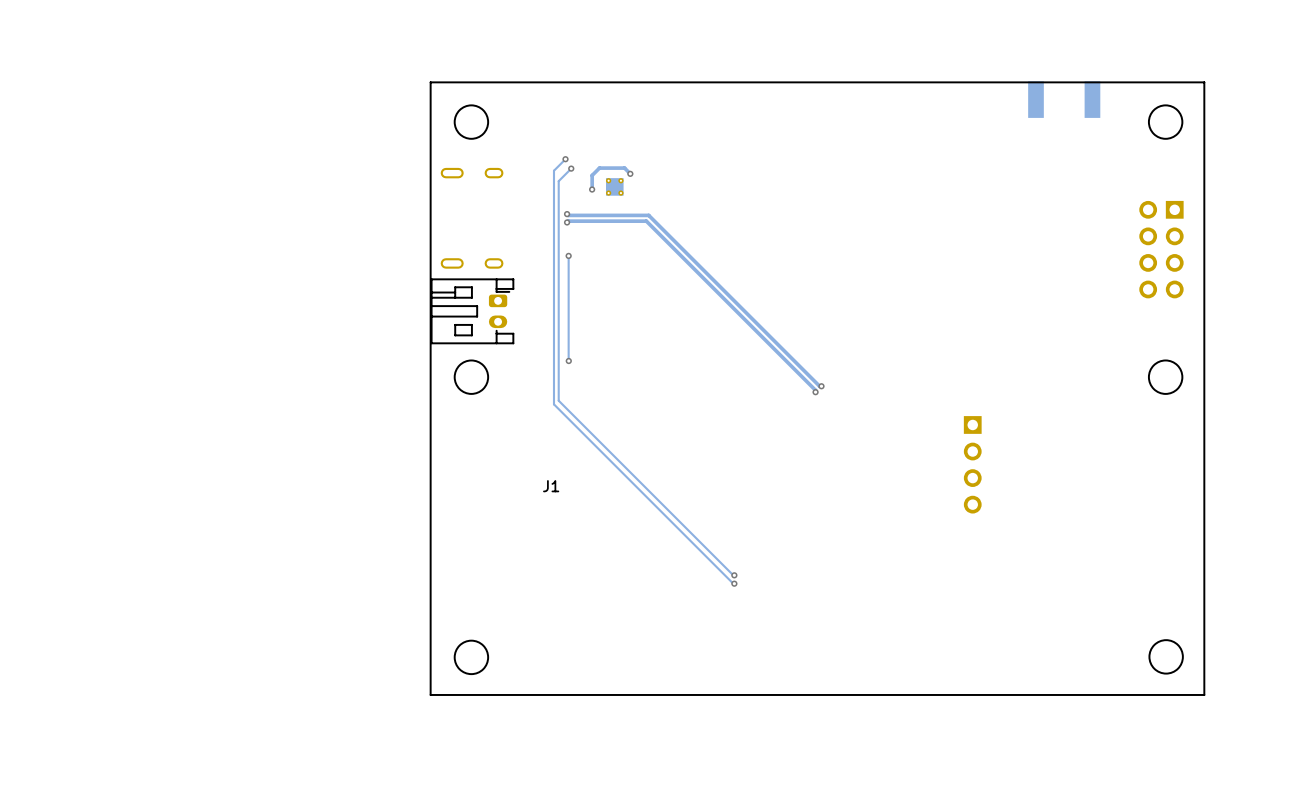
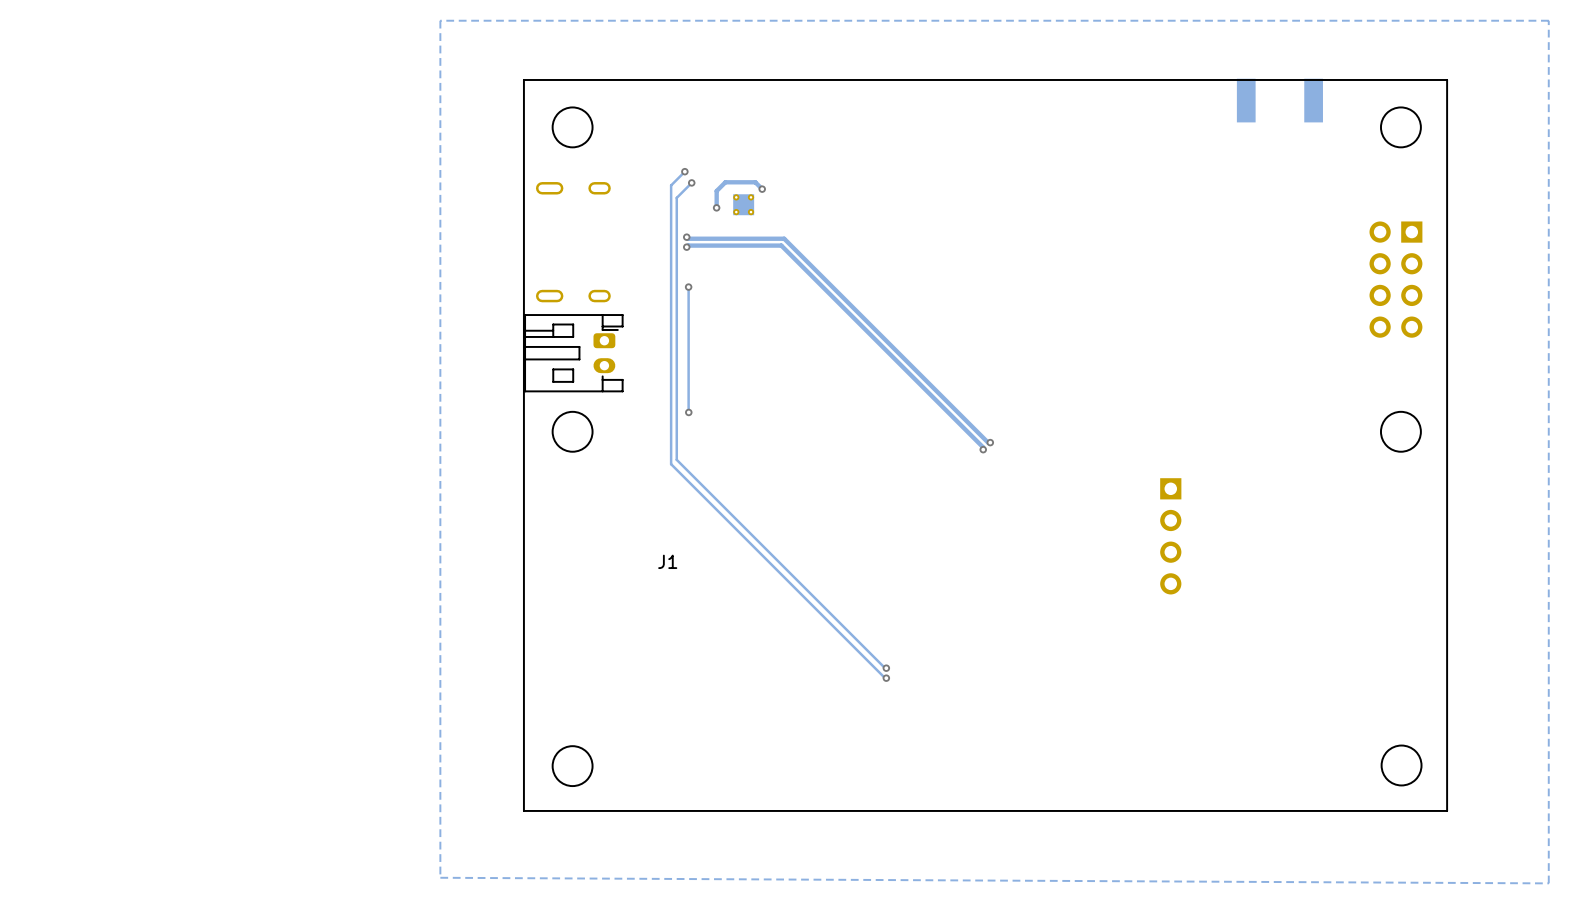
zone outline: none -> (1548, 20) (440, 20) (440, 877) (1548, 883) (1548, 20)

